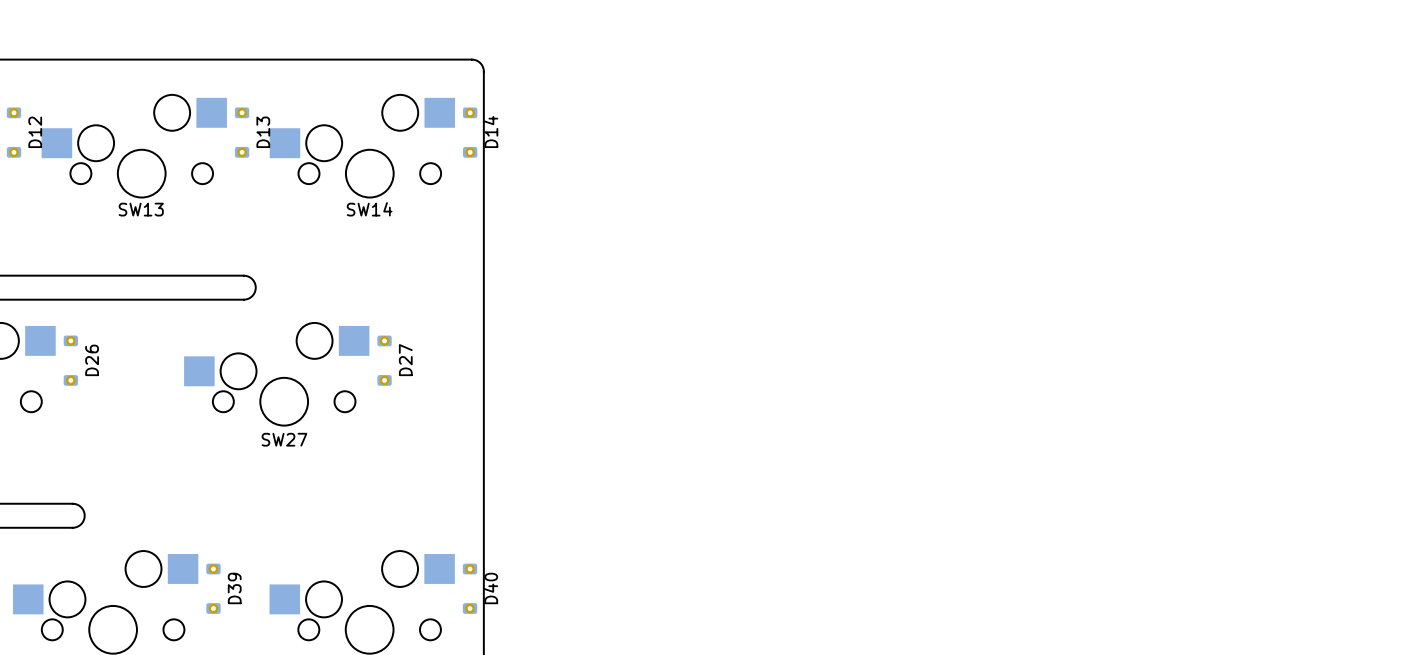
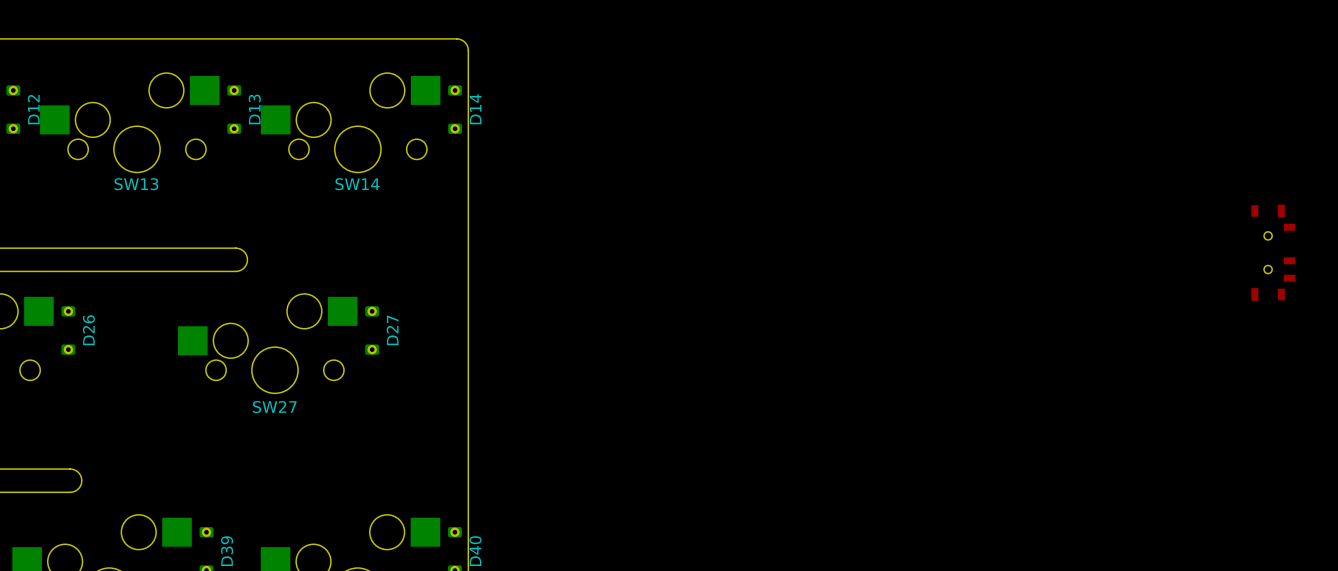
part: none -> (1273, 252)

